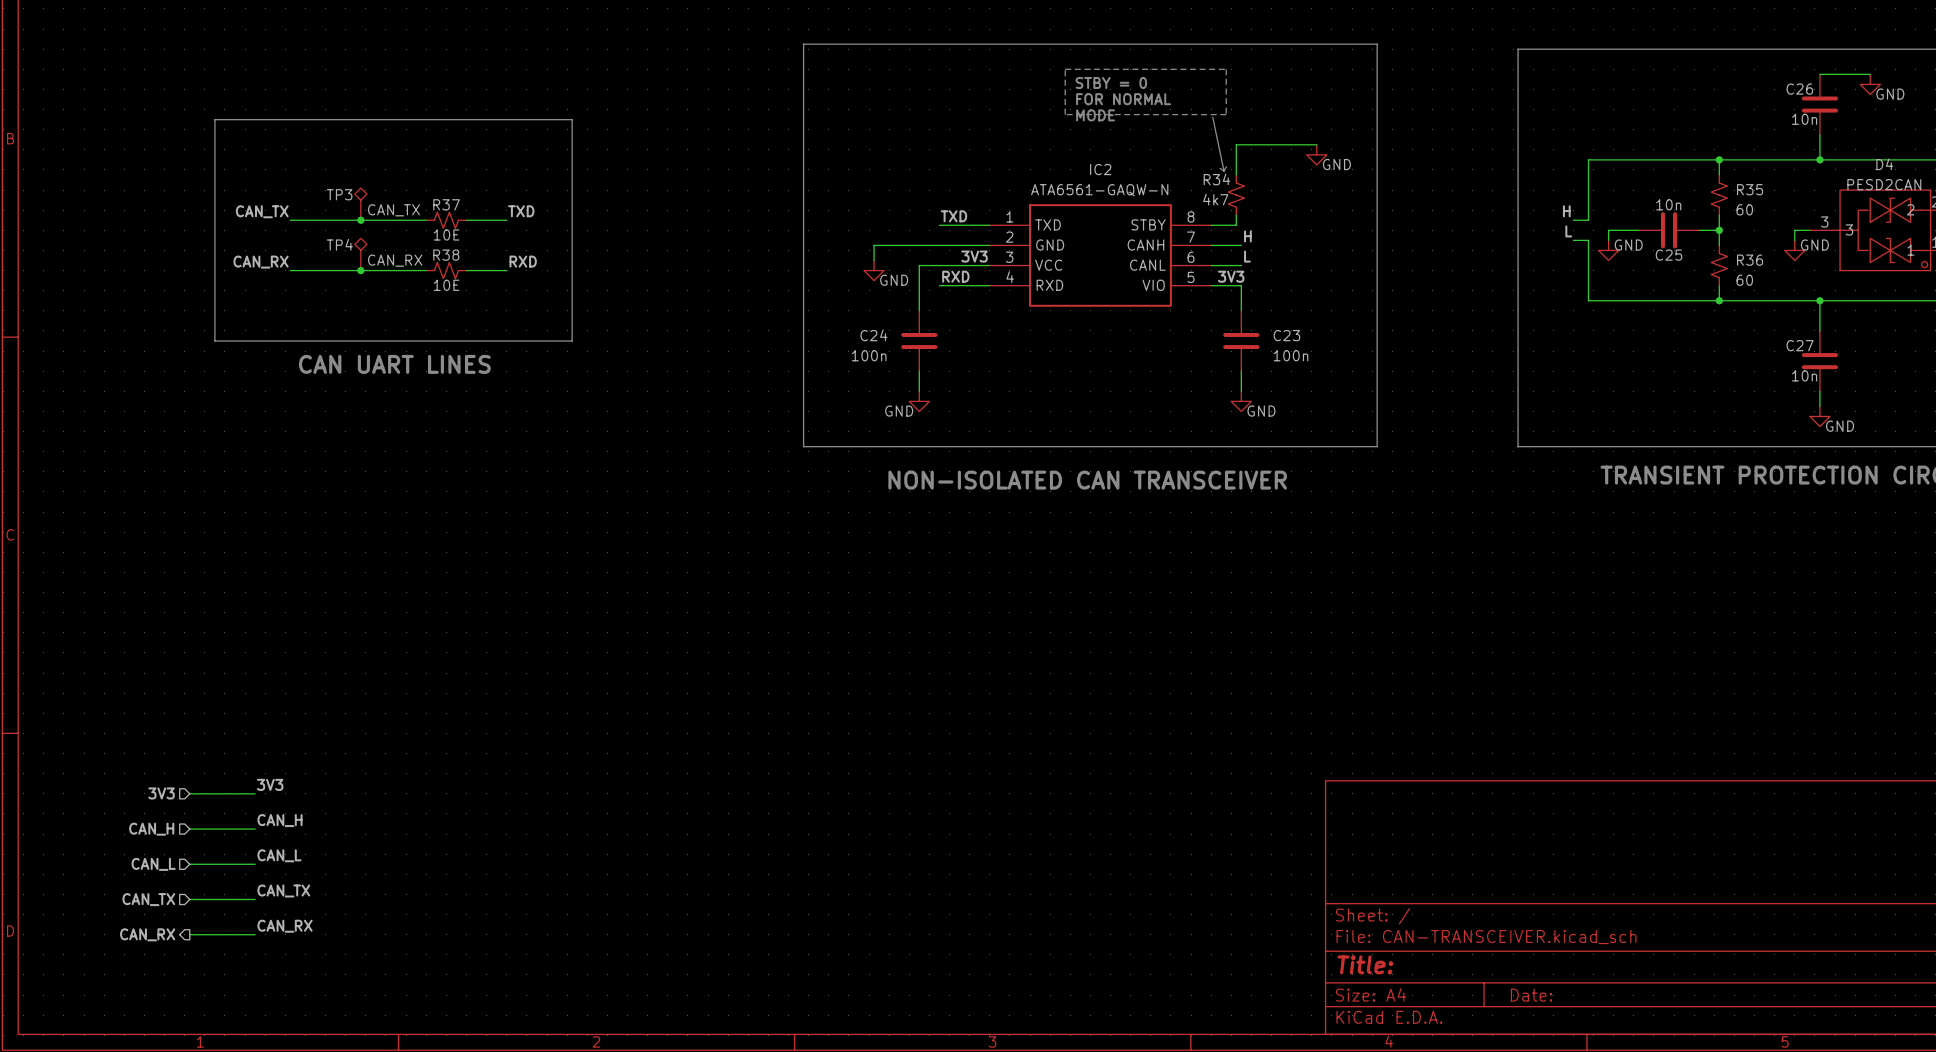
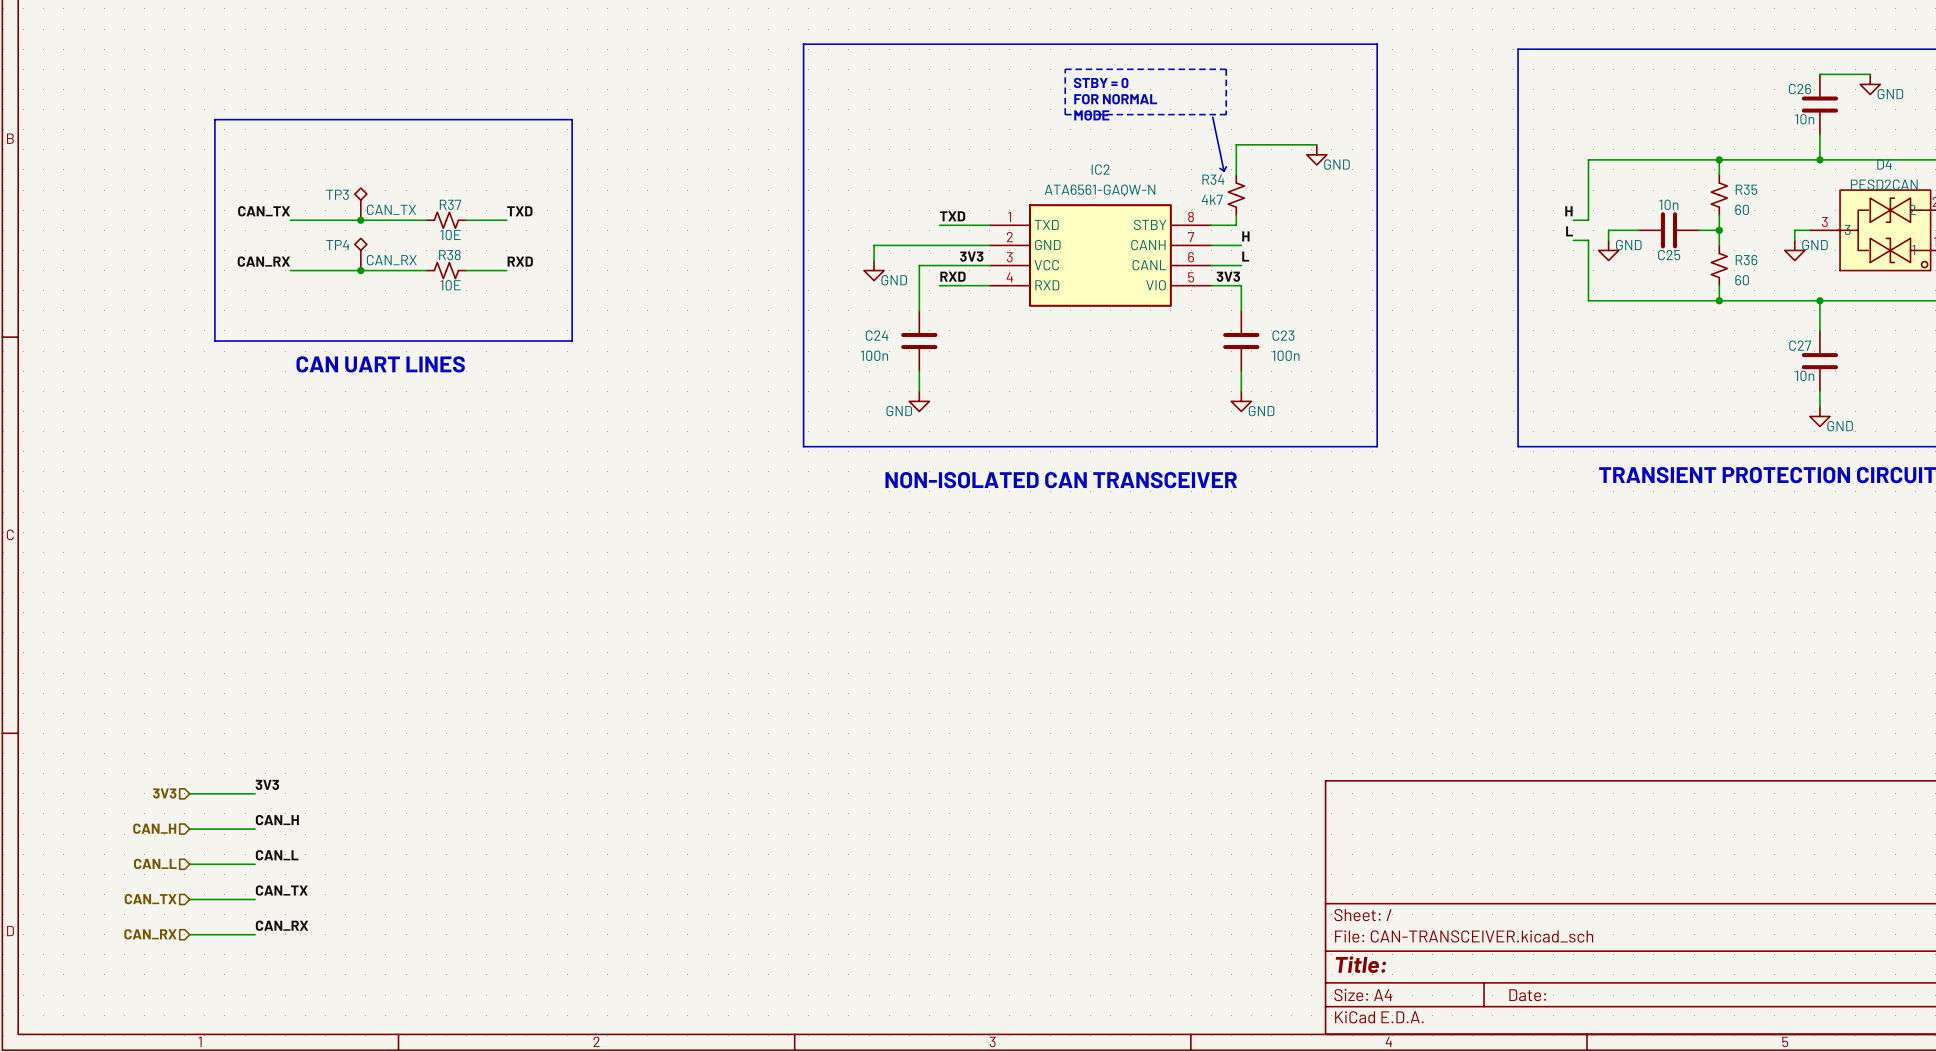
hierarchical label shape: output (147, 934) -> input (150, 934)

